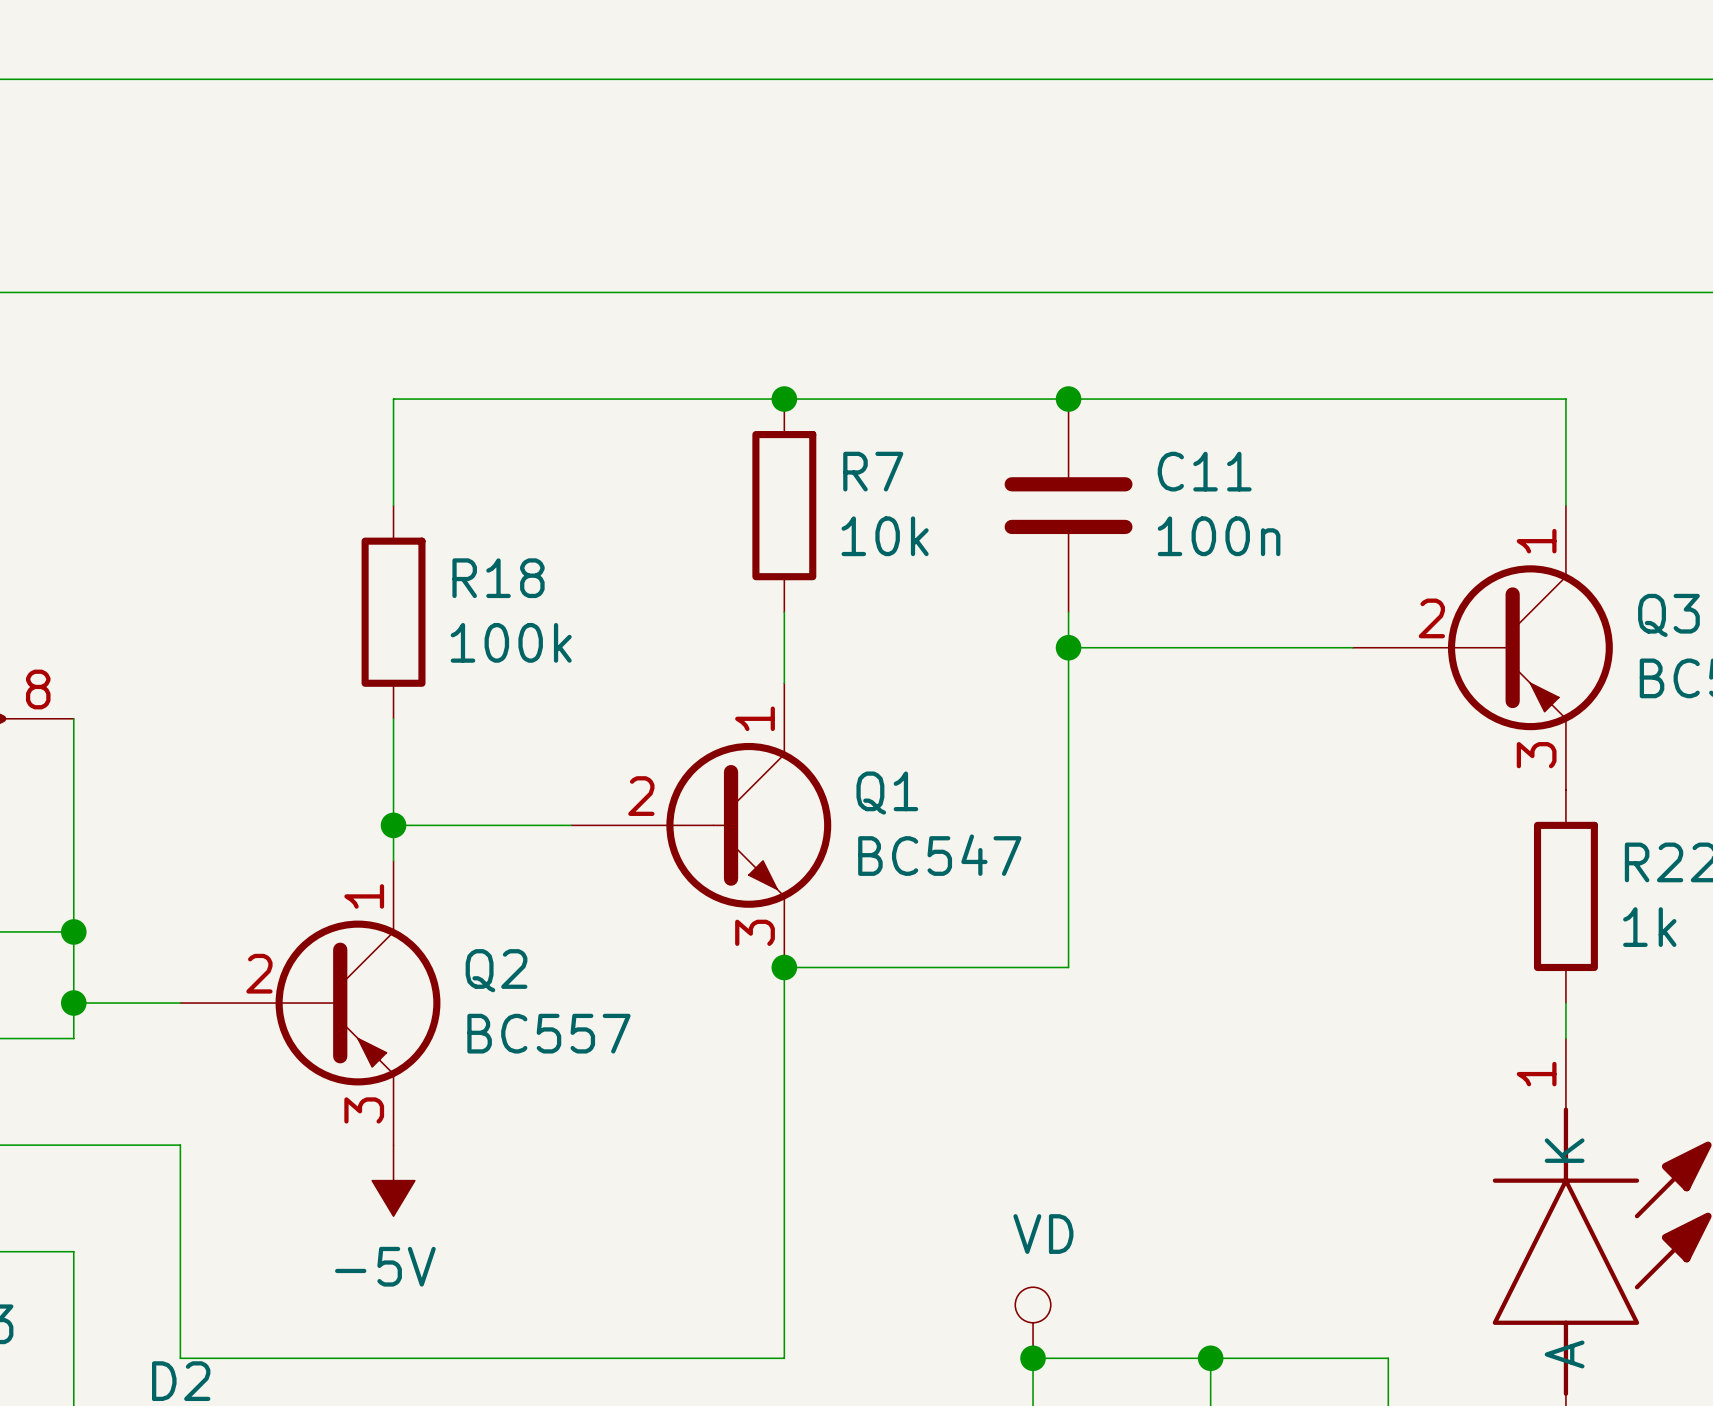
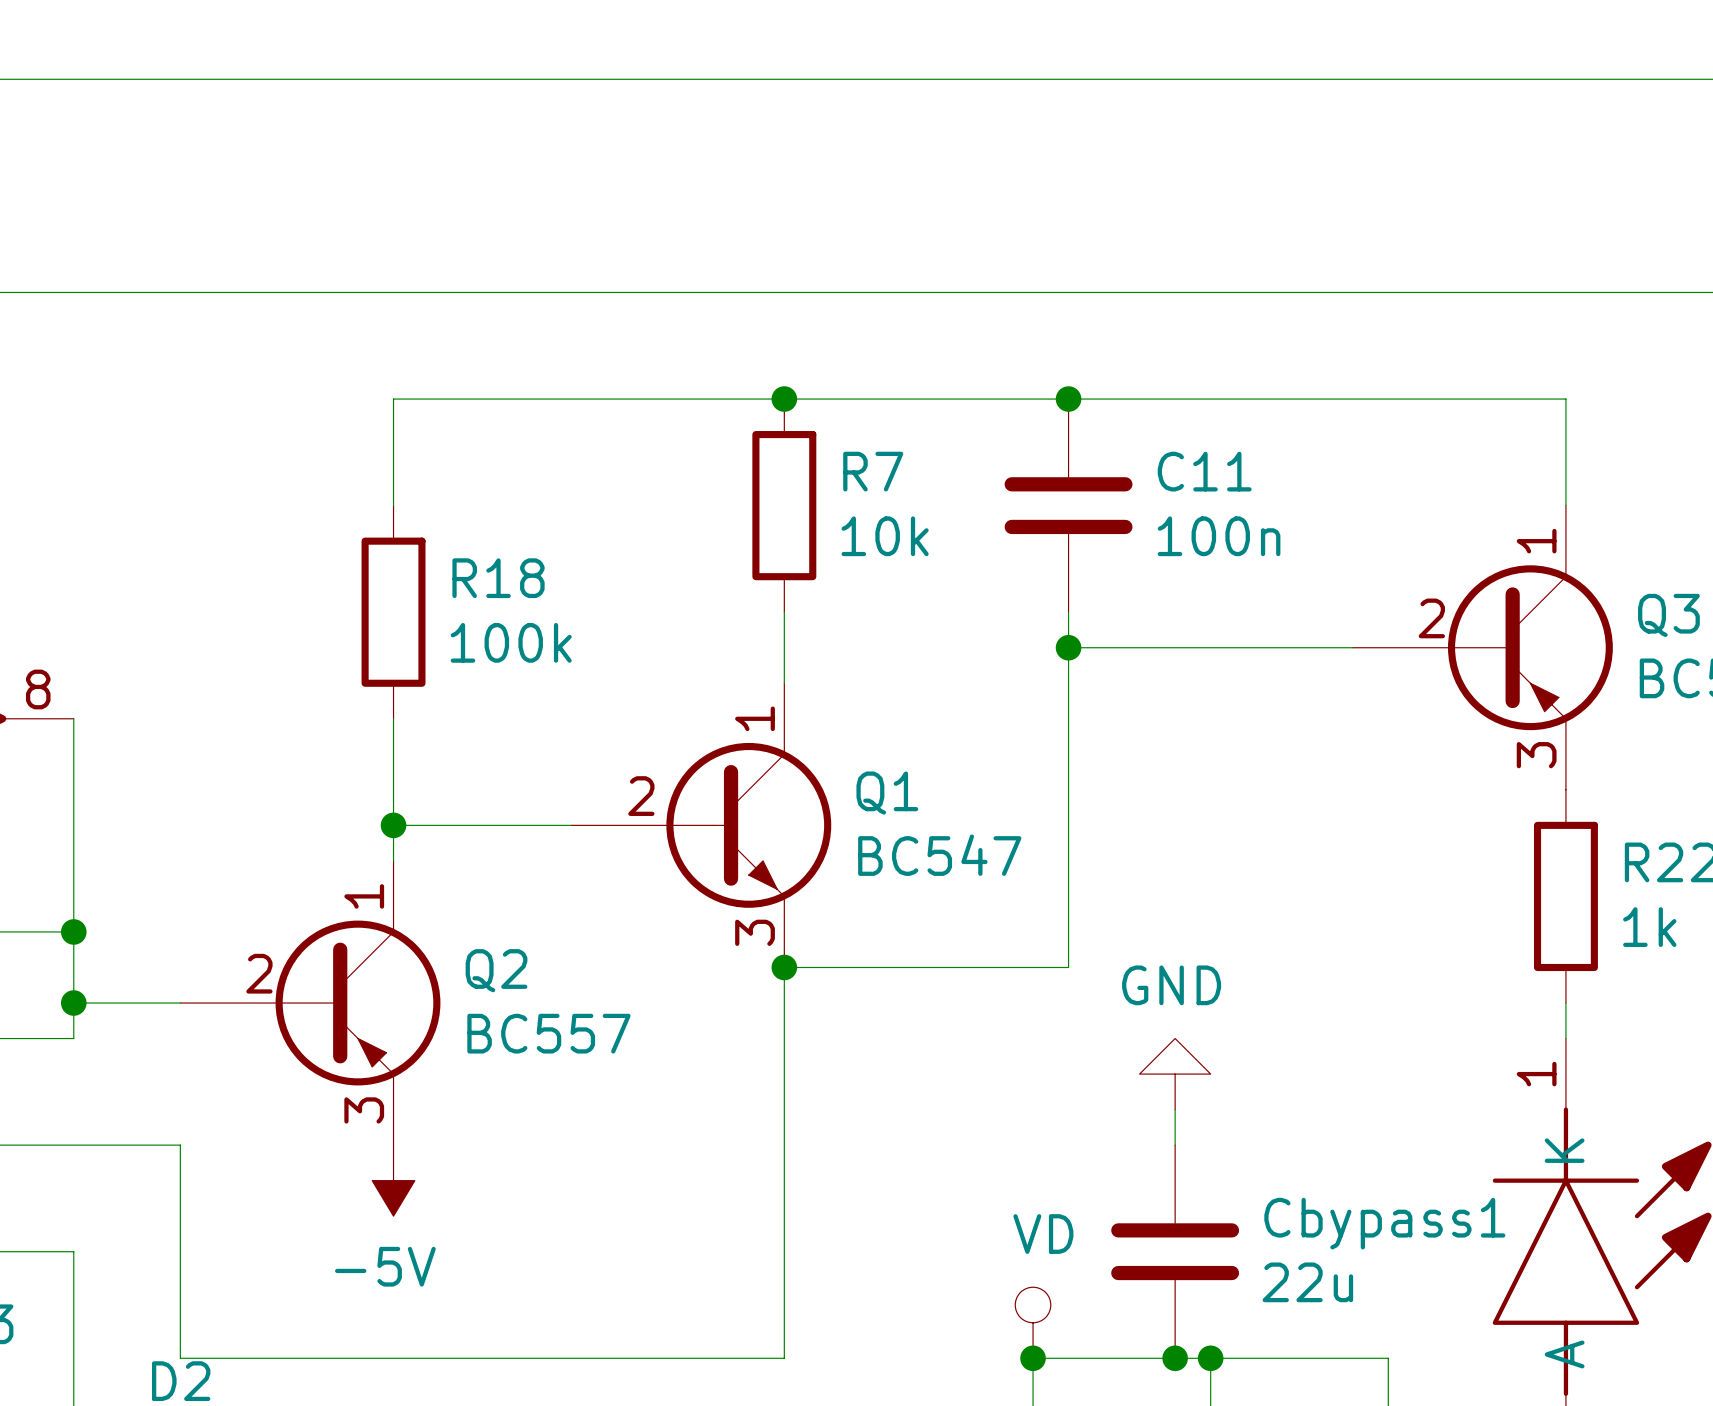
power symbol: none -> GND (1175, 1074)
wire: none -> (1175, 1109) (1175, 1145)
Cbypass1: none -> 22u (1175, 1251)
junction: none -> (1175, 1358)

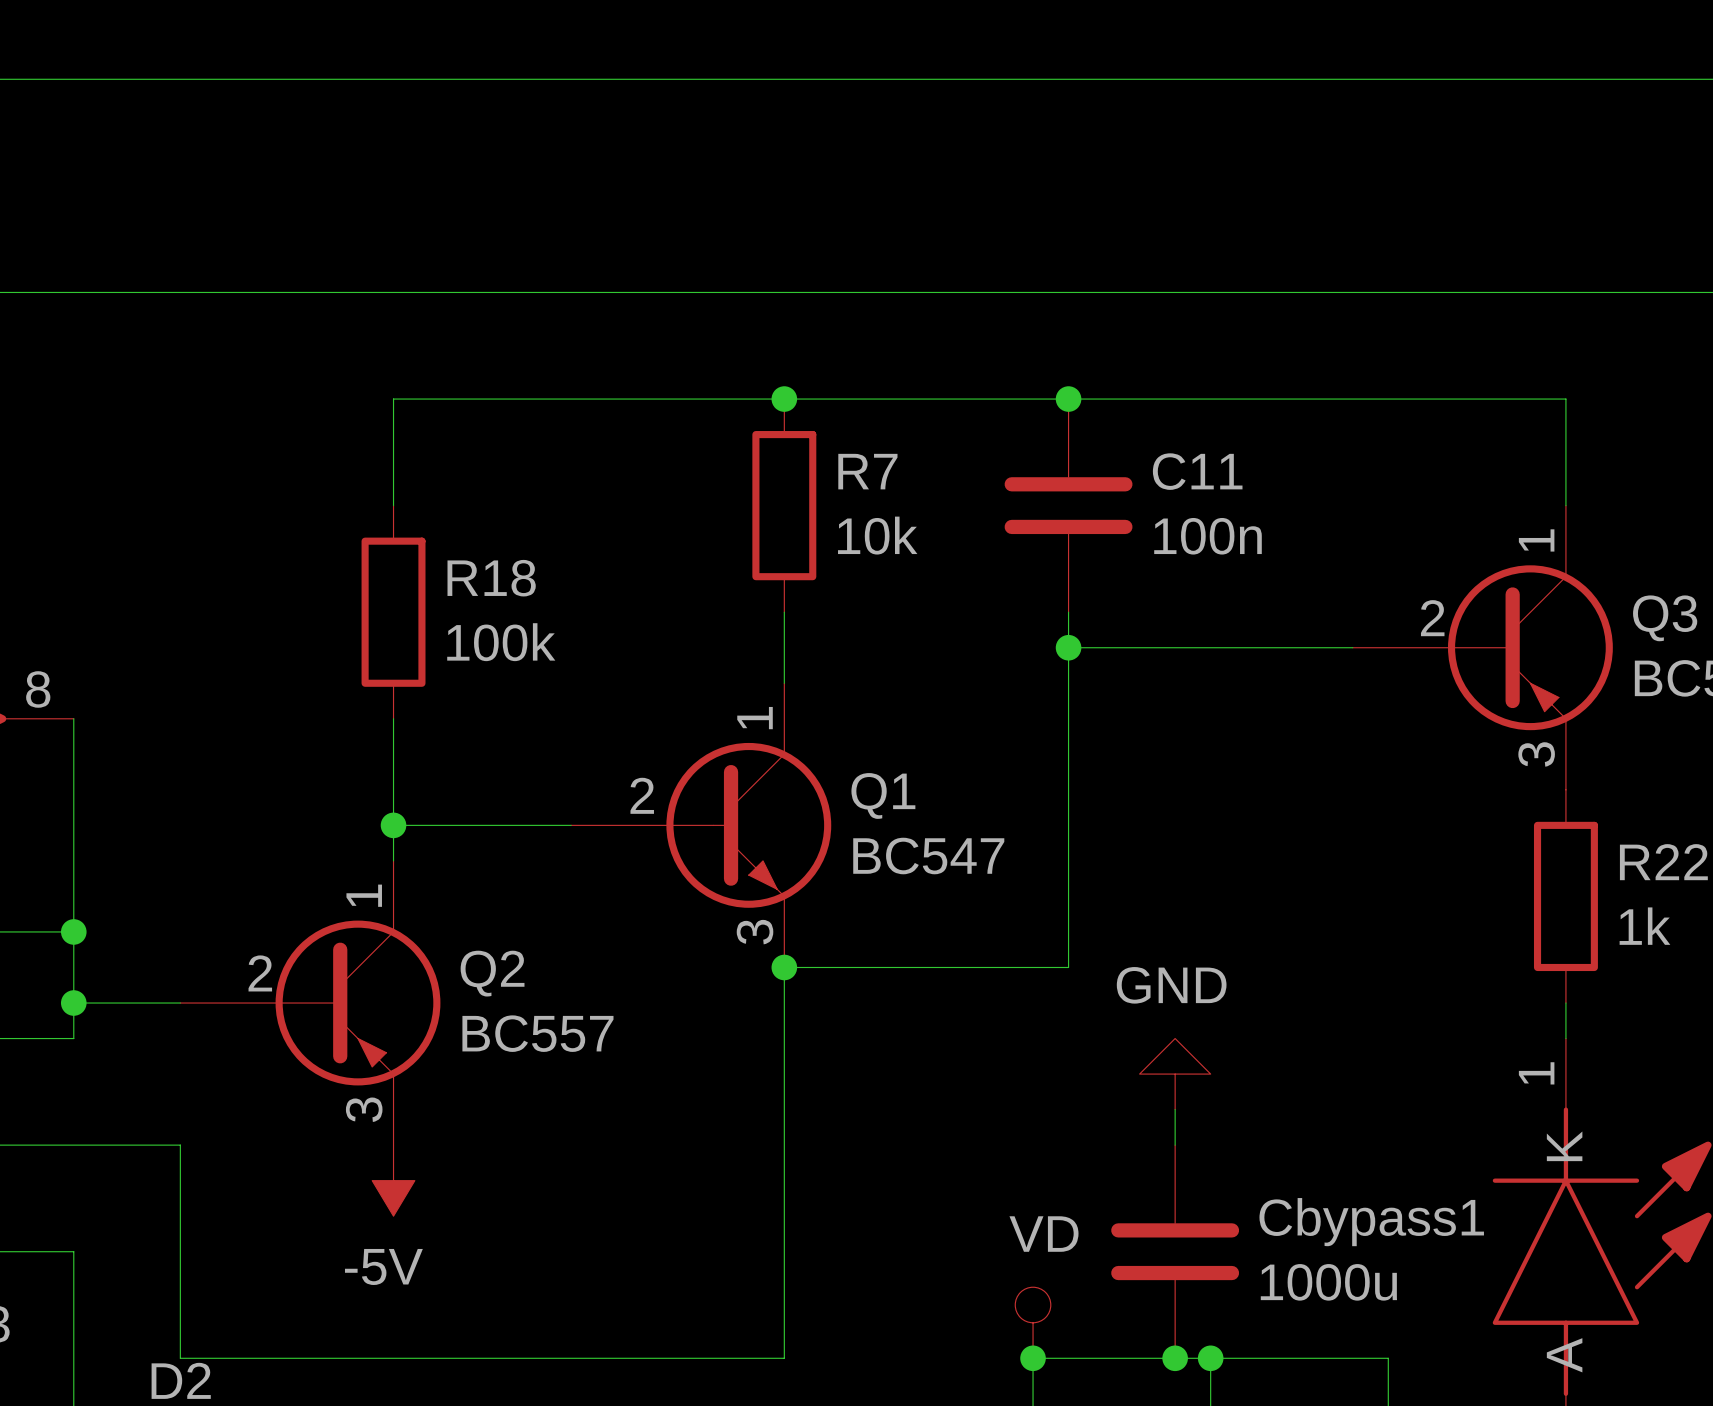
Cbypass1 value: 22u (1307, 1282) -> 1000u (1328, 1282)

